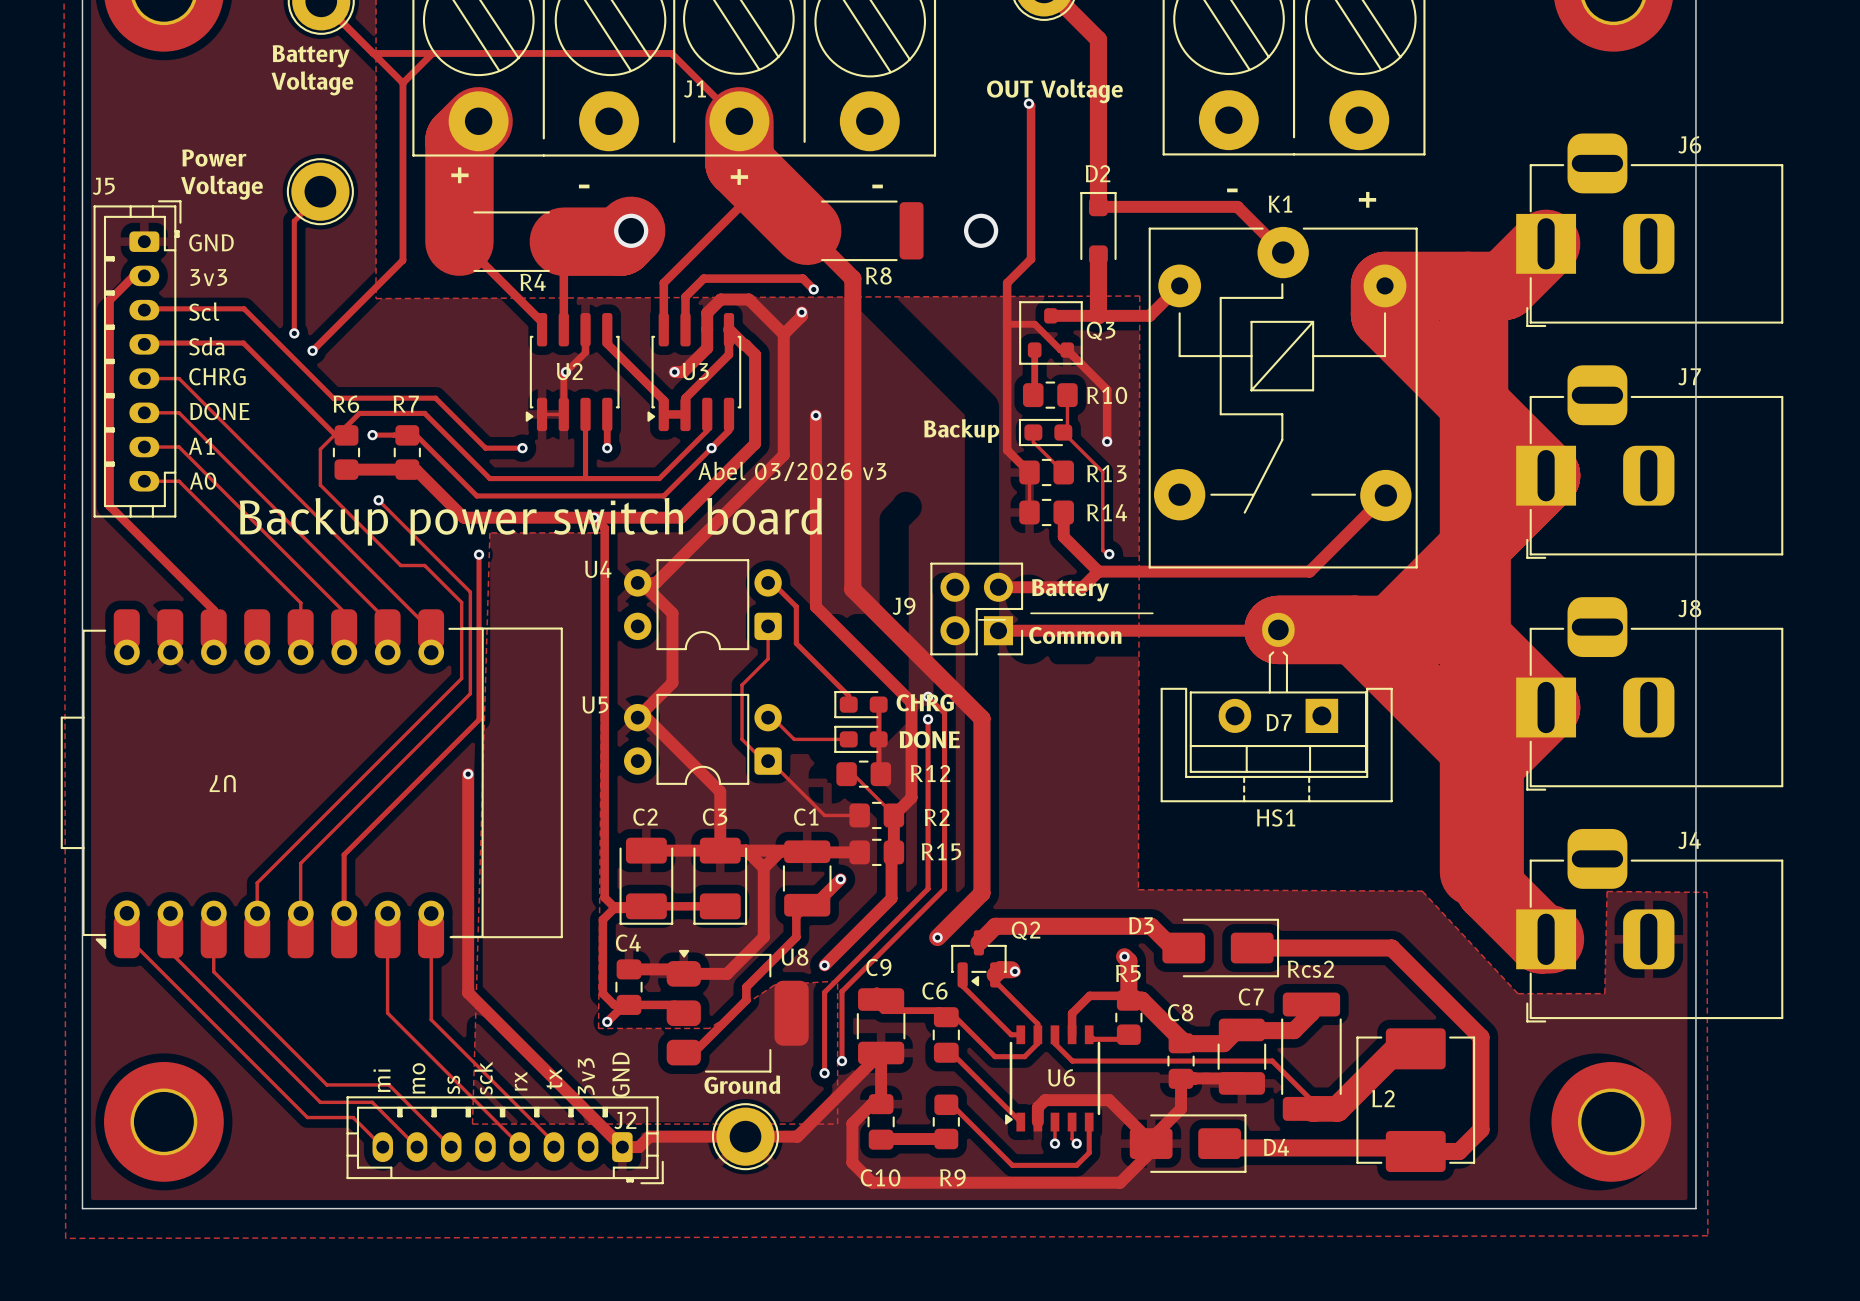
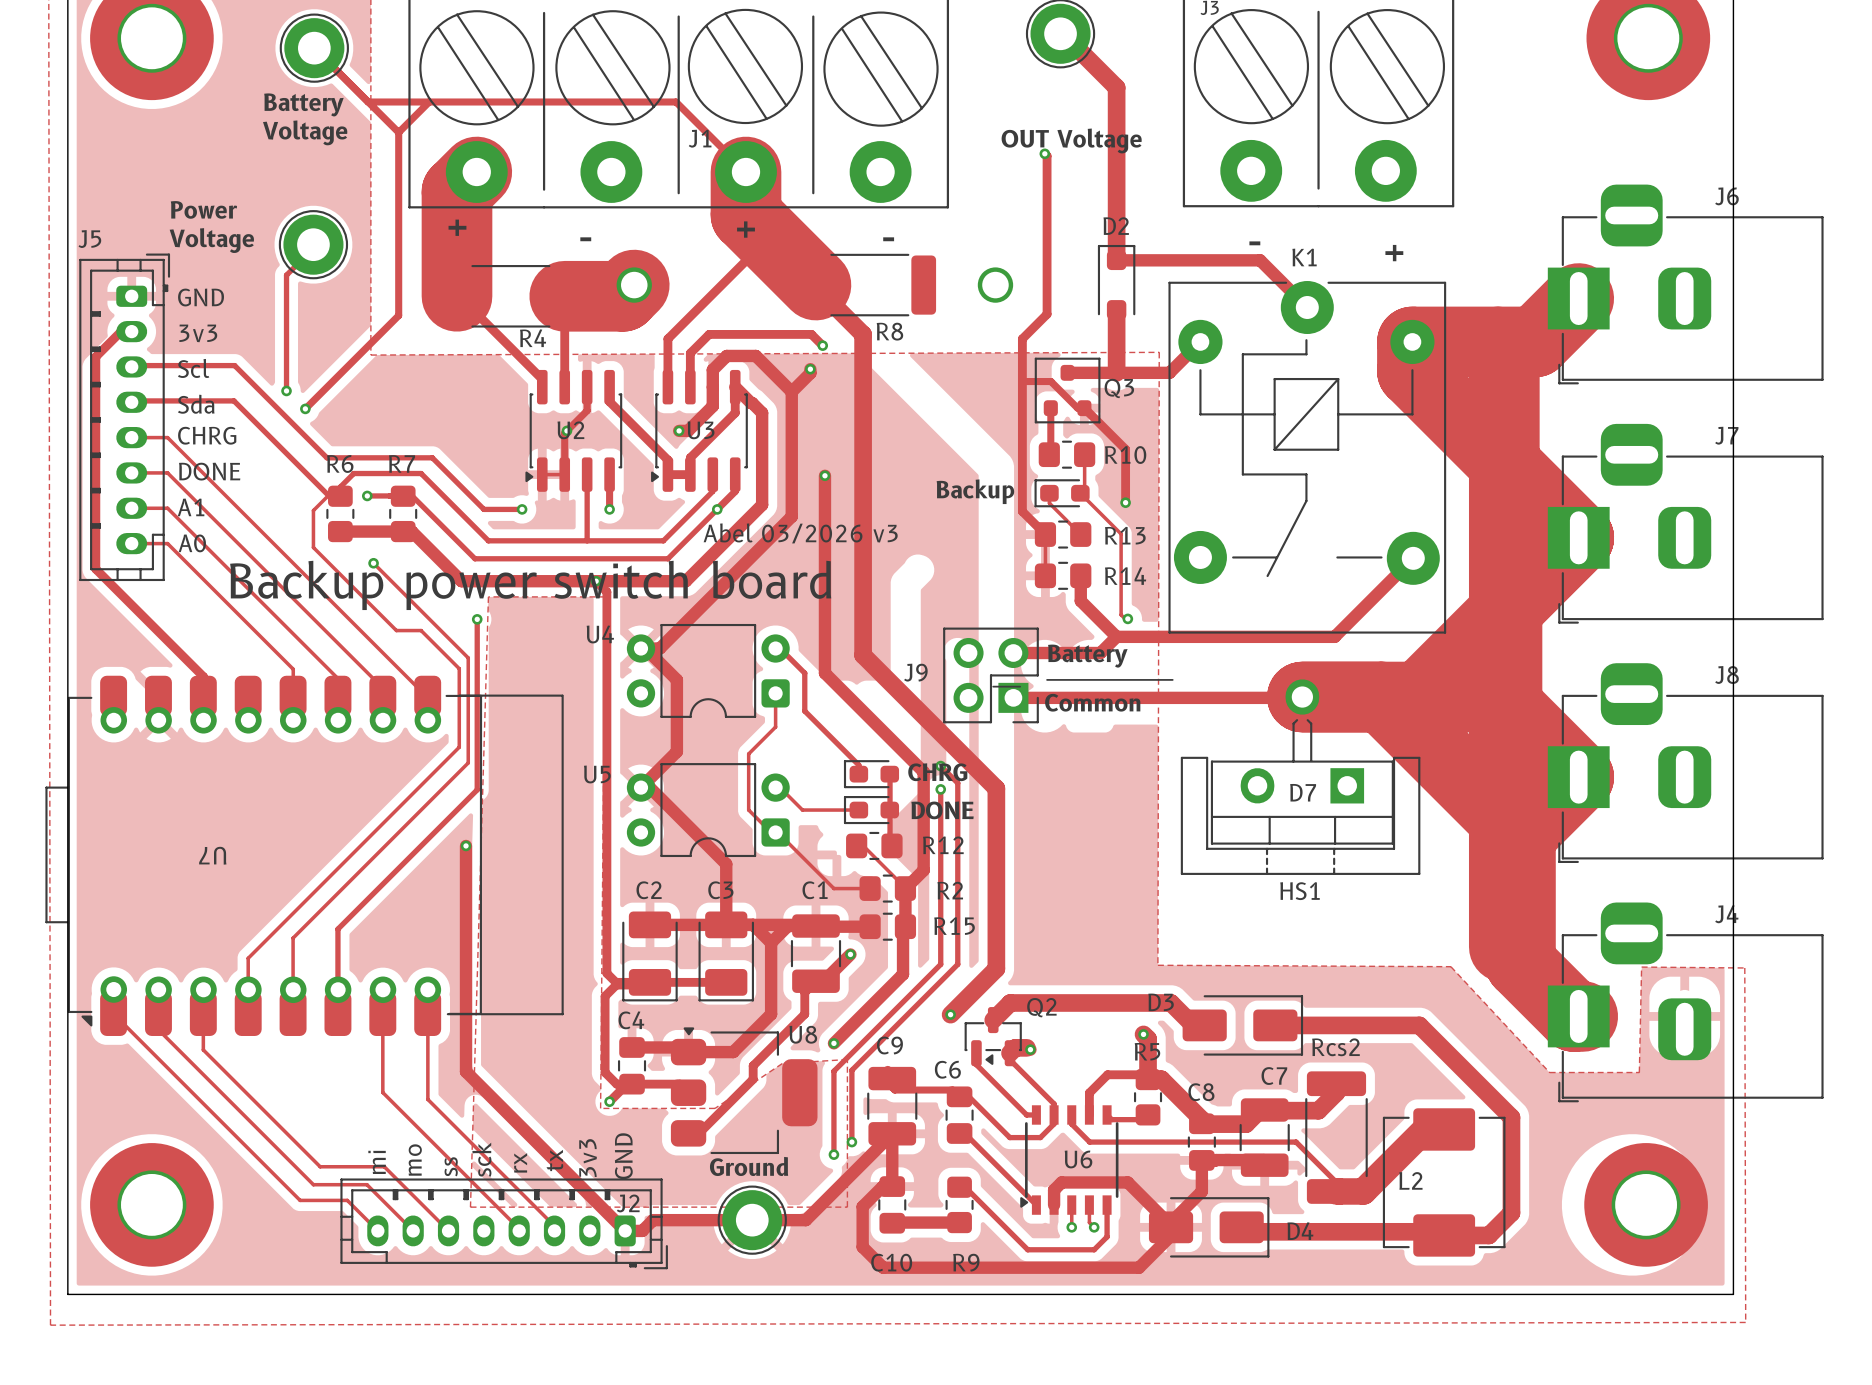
J4 footprint: [1516, 828, 1784, 1023] -> [1547, 902, 1824, 1103]

